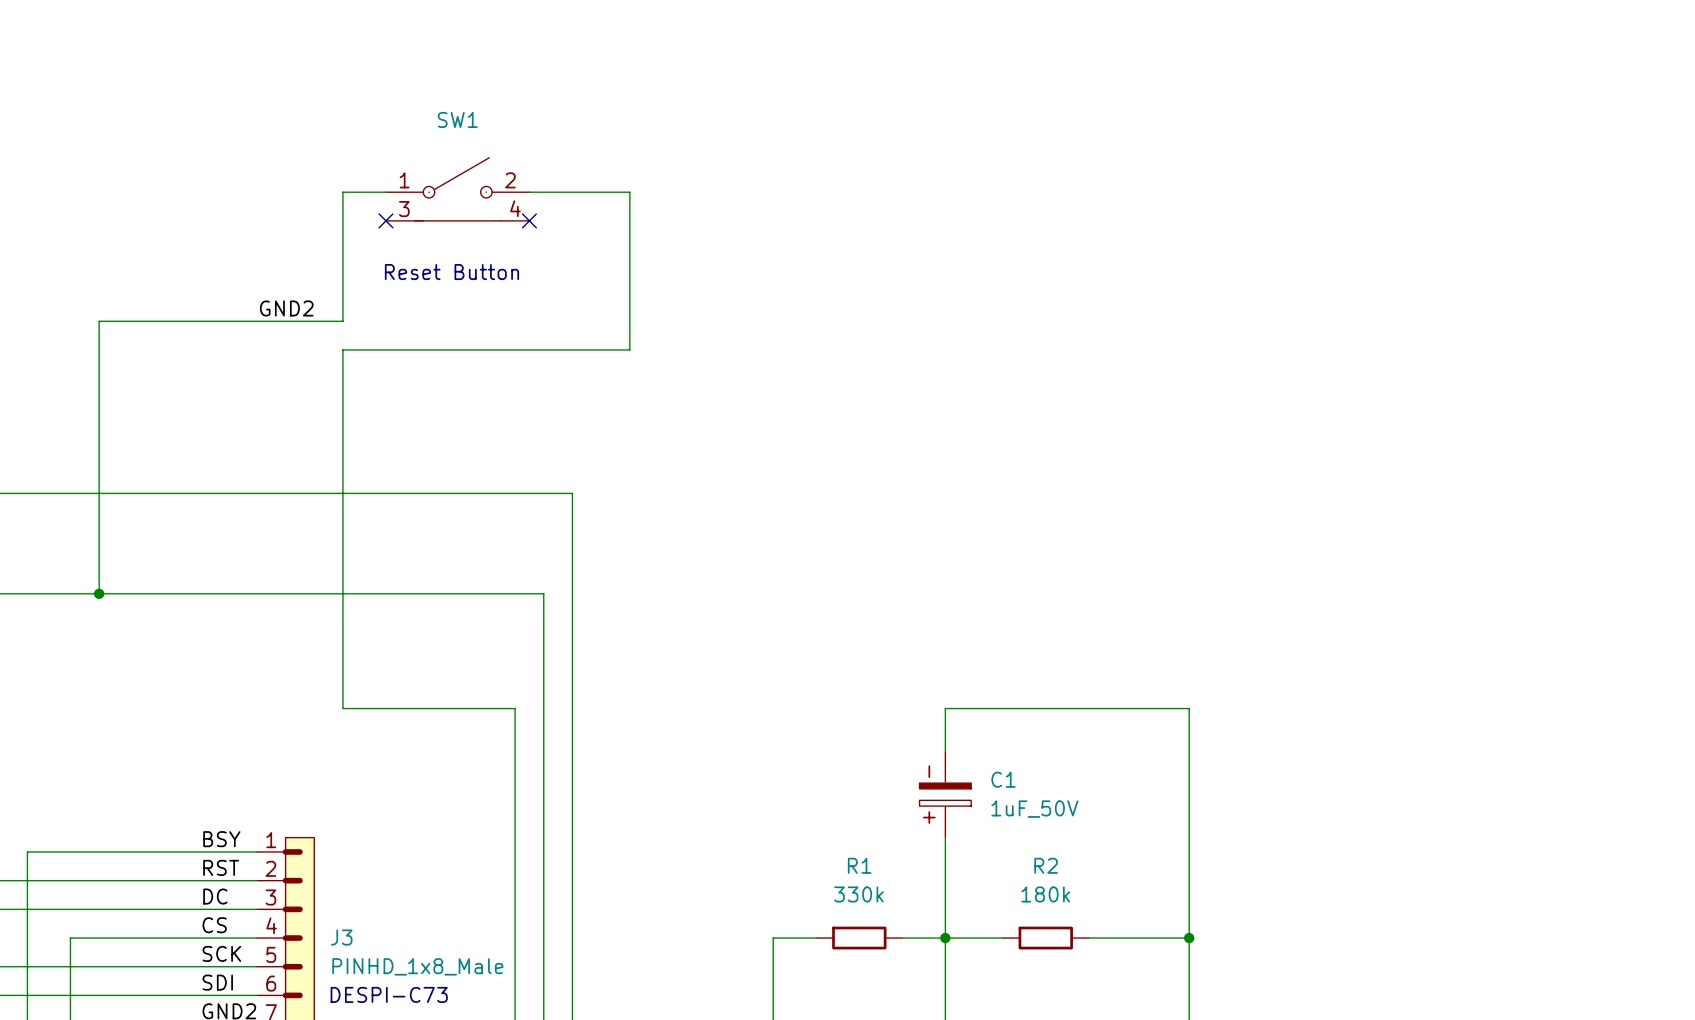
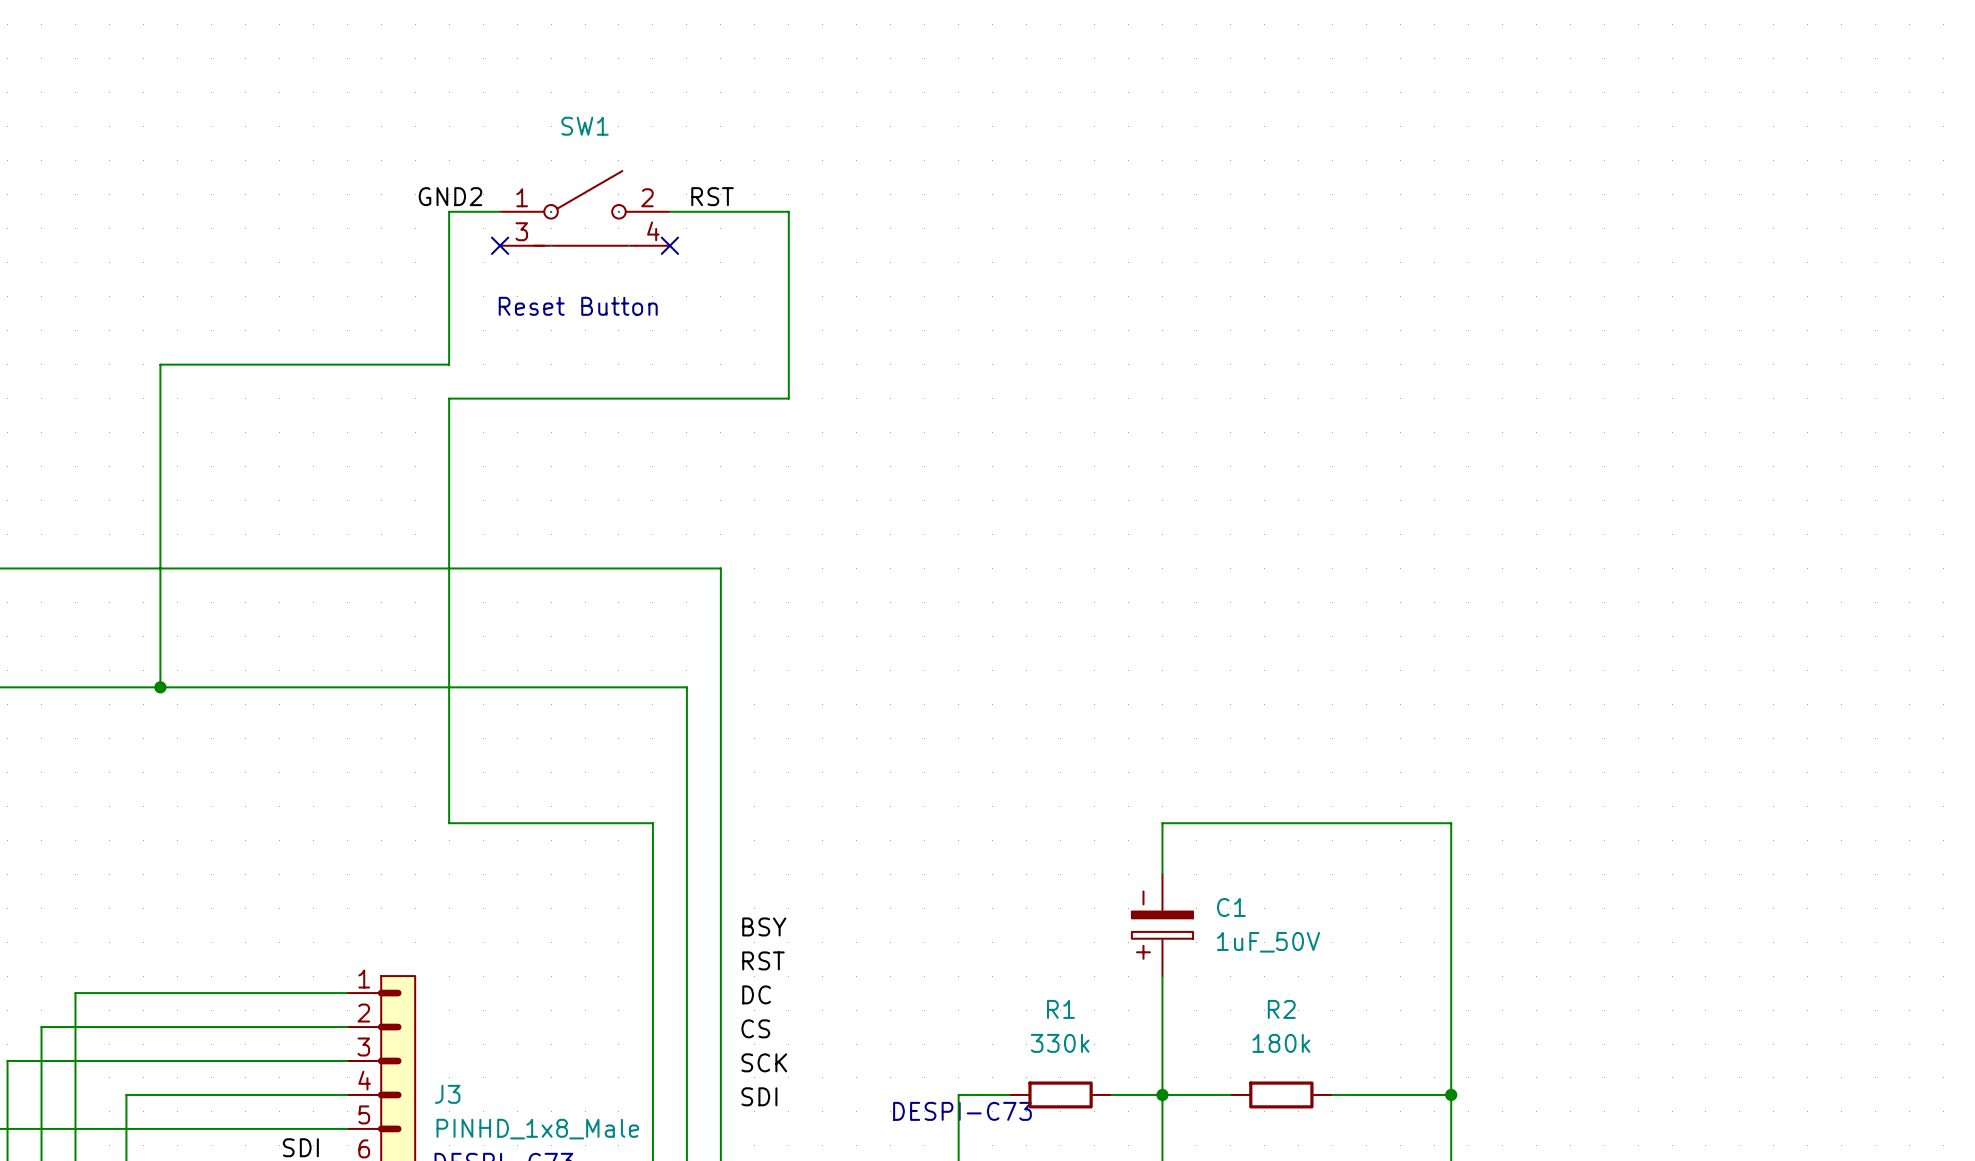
label: none -> RST (712, 196)
label position: GND2 (286, 308) -> GND2 (450, 196)
label: none -> BSY (764, 926)
label: none -> RST (763, 960)
label: BSY (221, 839) -> none
label: none -> DC (756, 994)
label: RST (221, 867) -> none
label: none -> CS (755, 1028)
label: DC (215, 896) -> none
label: none -> SCK (764, 1062)
label: CS (214, 925) -> none
label: none -> SDI (759, 1096)
text: none -> DESPI-C73 (962, 1111)
label: SCK (221, 953) -> none

